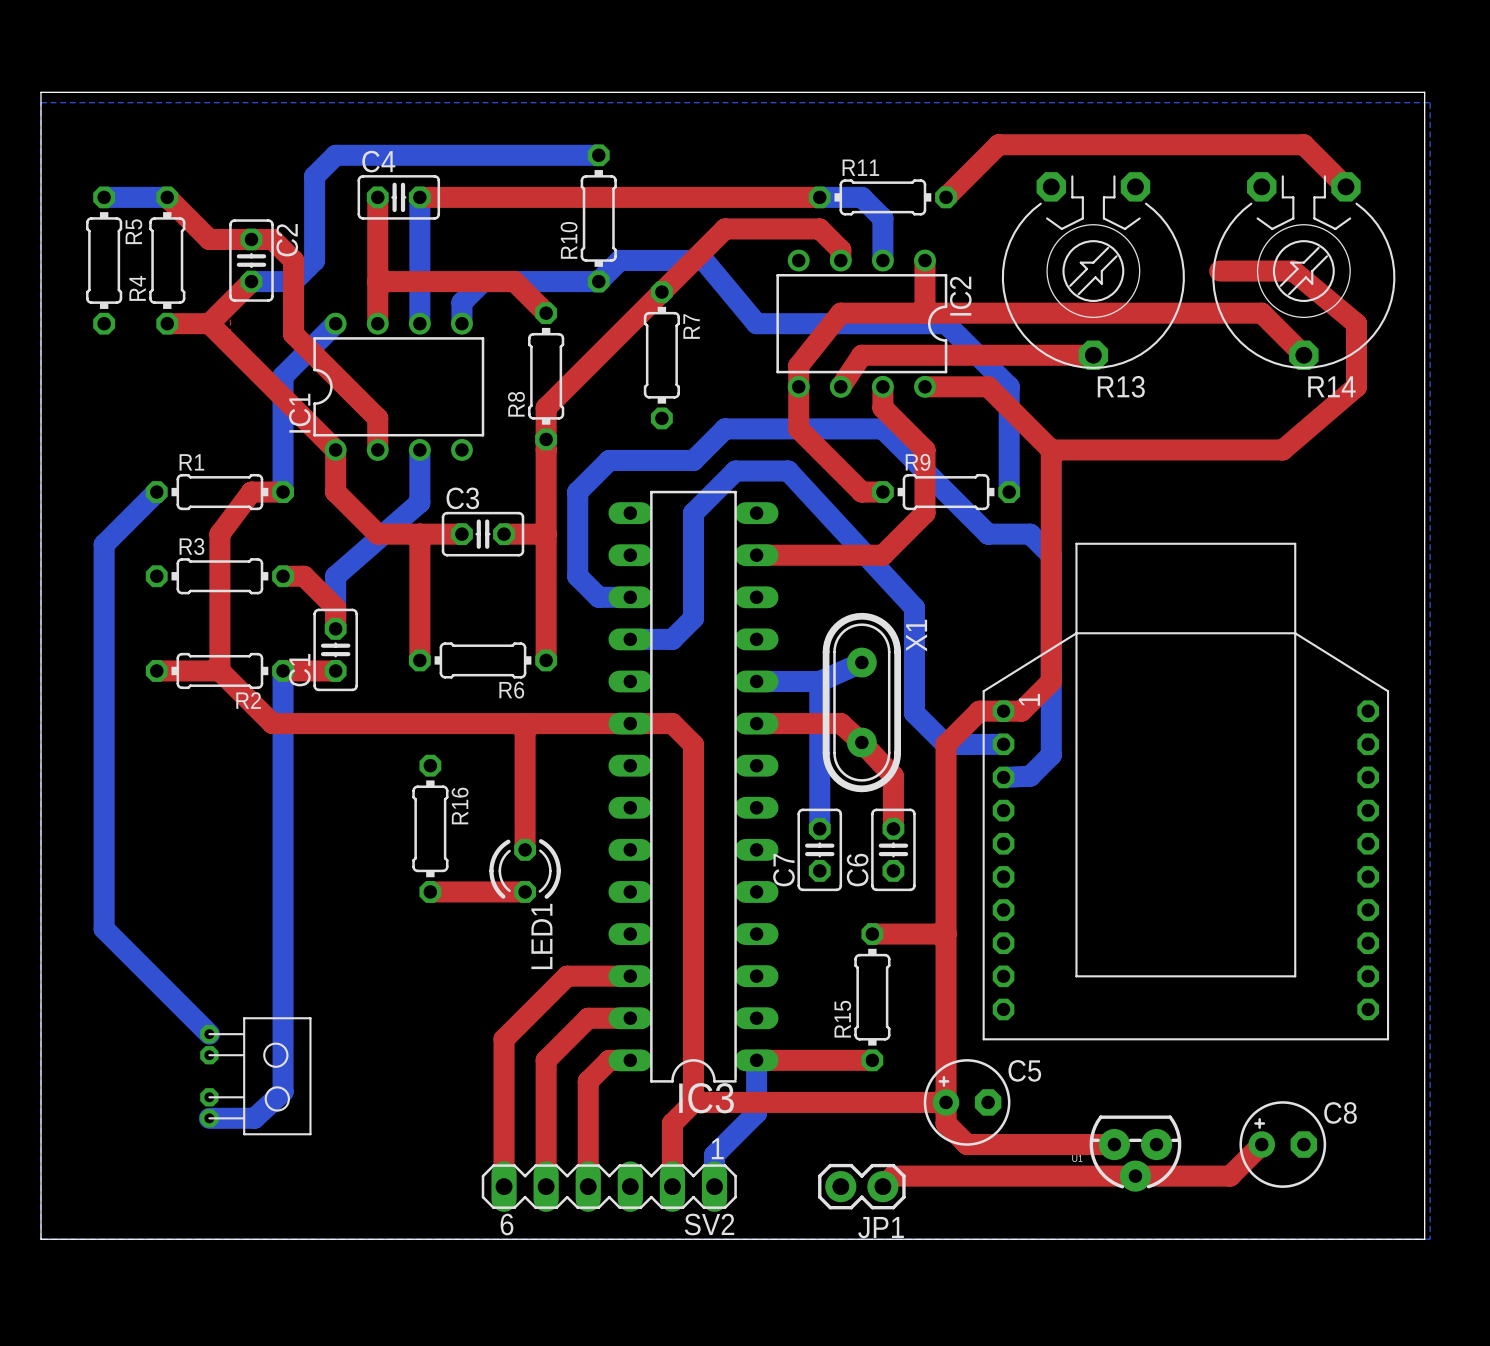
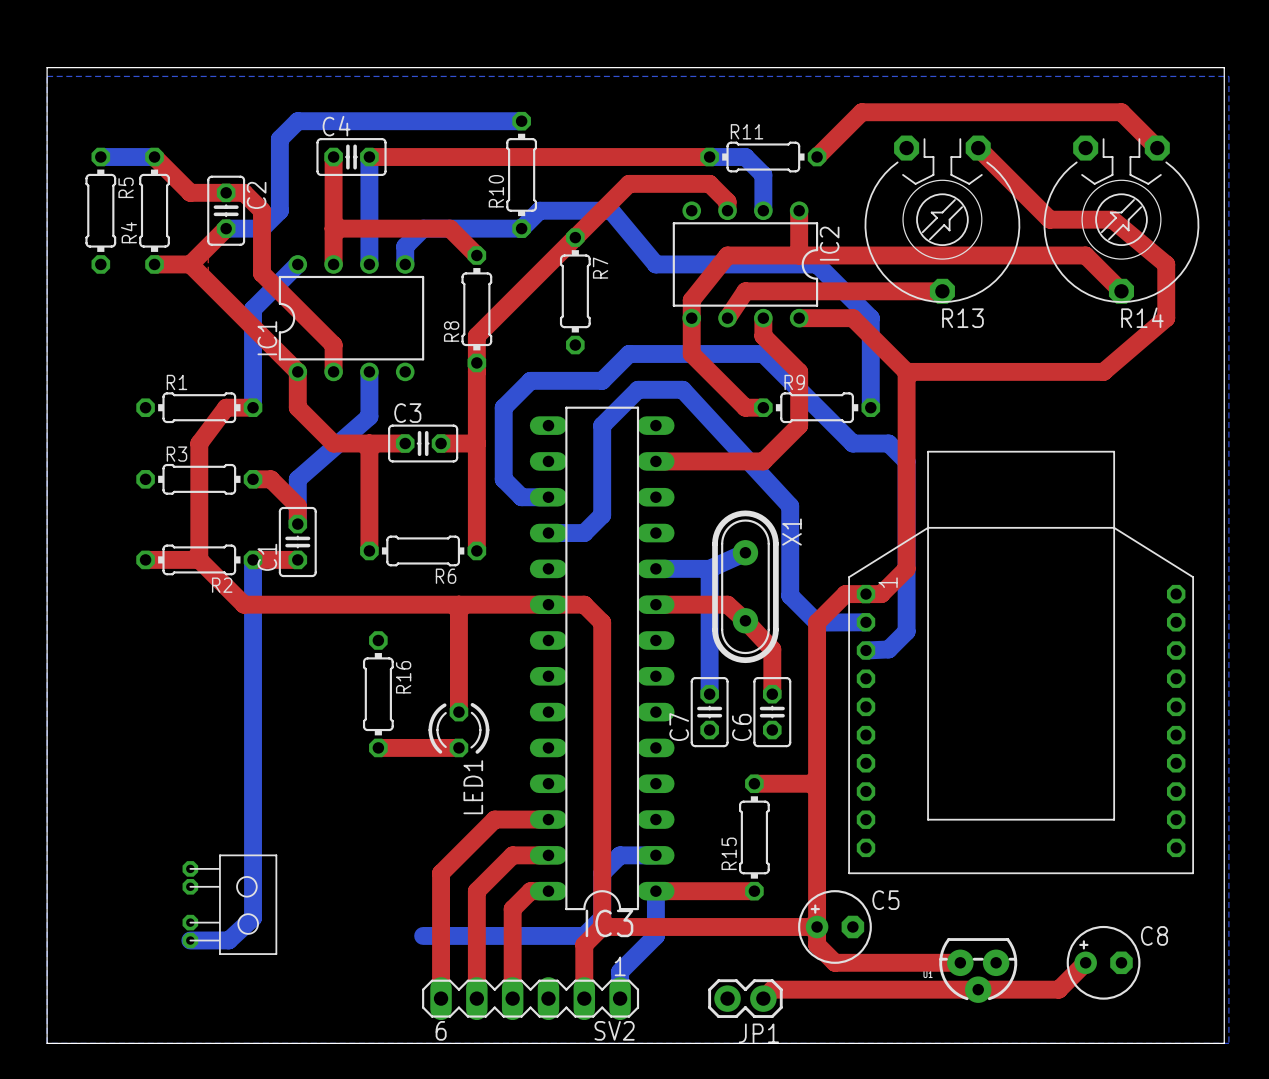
top track: none -> (978, 148) (1049, 219)
bottom track: (156, 492) (104, 544) (104, 928) (209, 1034) -> none
bottom track: none -> (655, 855) (620, 855) (602, 873) (602, 918) (584, 935) (423, 935)

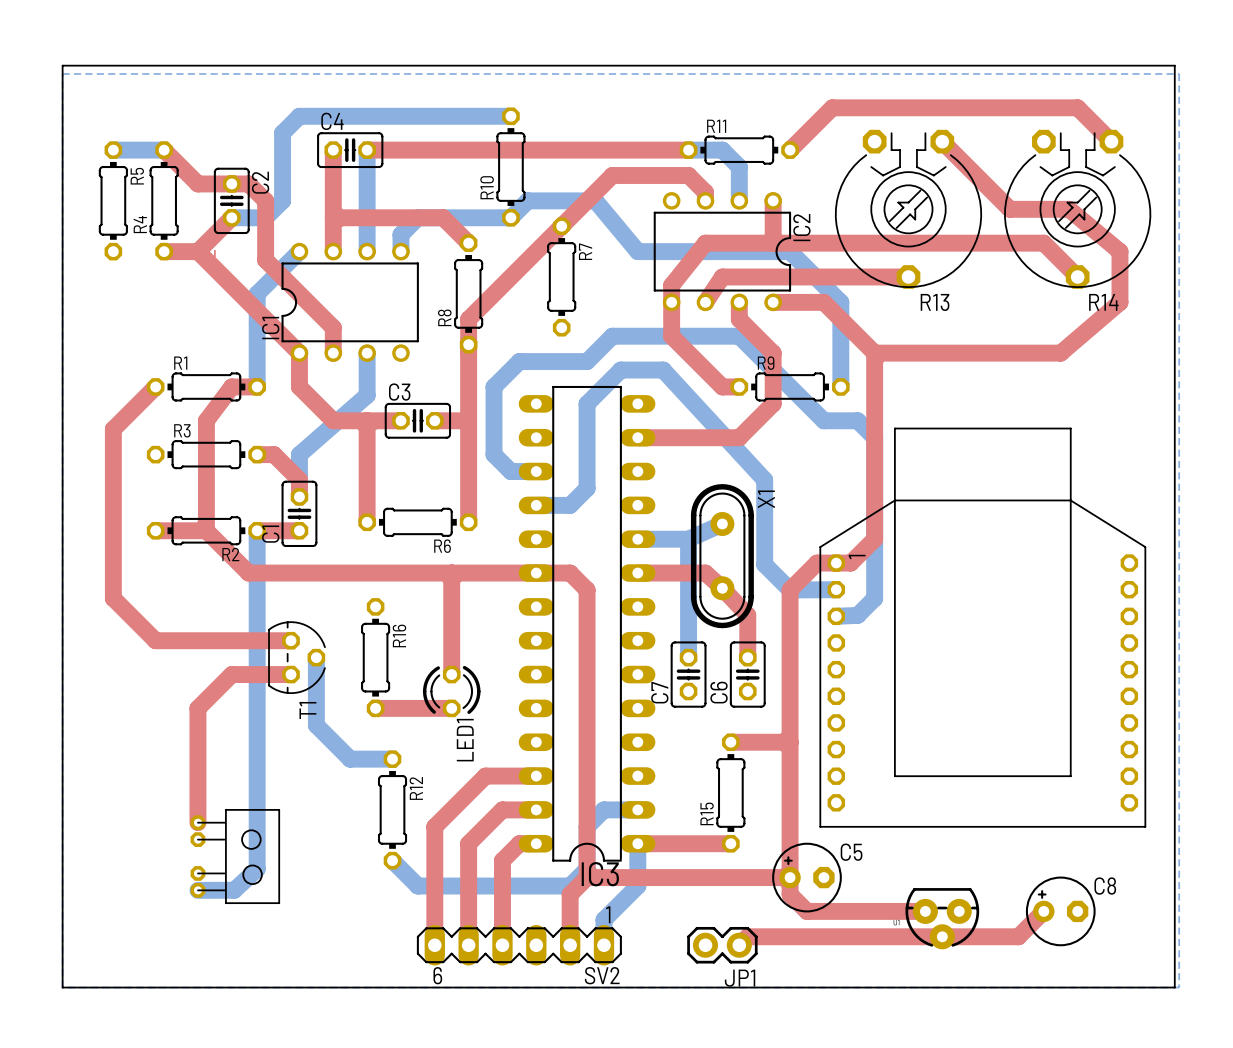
top track: none -> (155, 386) (113, 429) (113, 598) (155, 640) (291, 640)
T1: none -> (296, 657)
bottom track: none -> (316, 657) (316, 725) (350, 759) (392, 759)
top track: none -> (291, 674) (231, 674) (197, 708) (197, 822)
R12: none -> (392, 809)
bottom track: none -> (392, 860) (417, 886)

